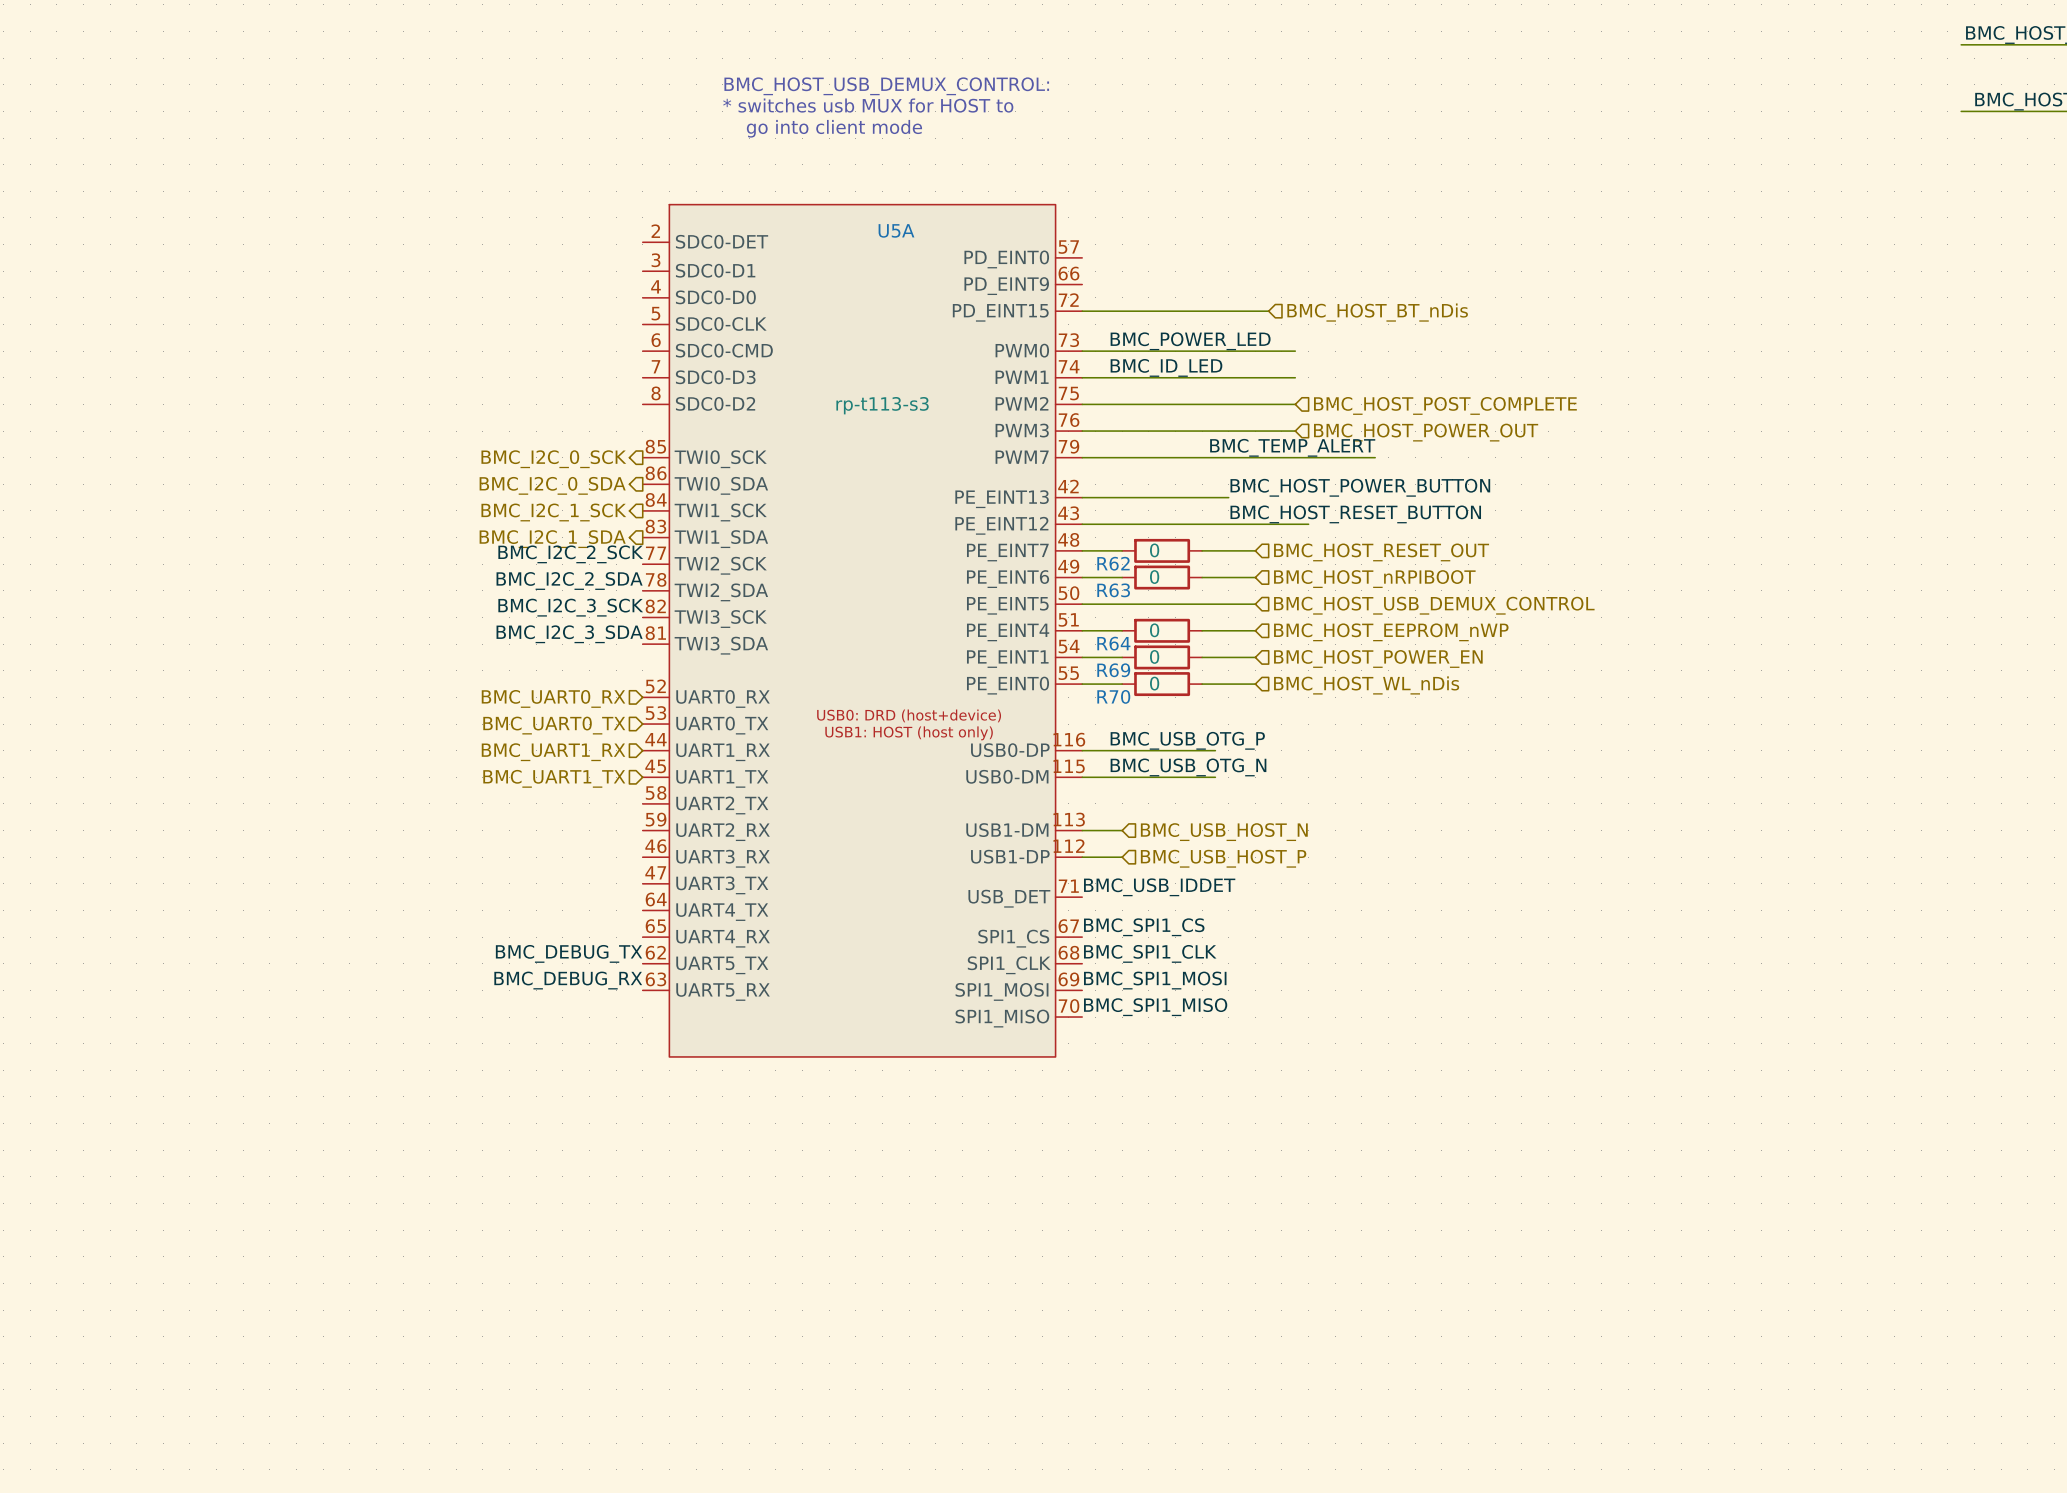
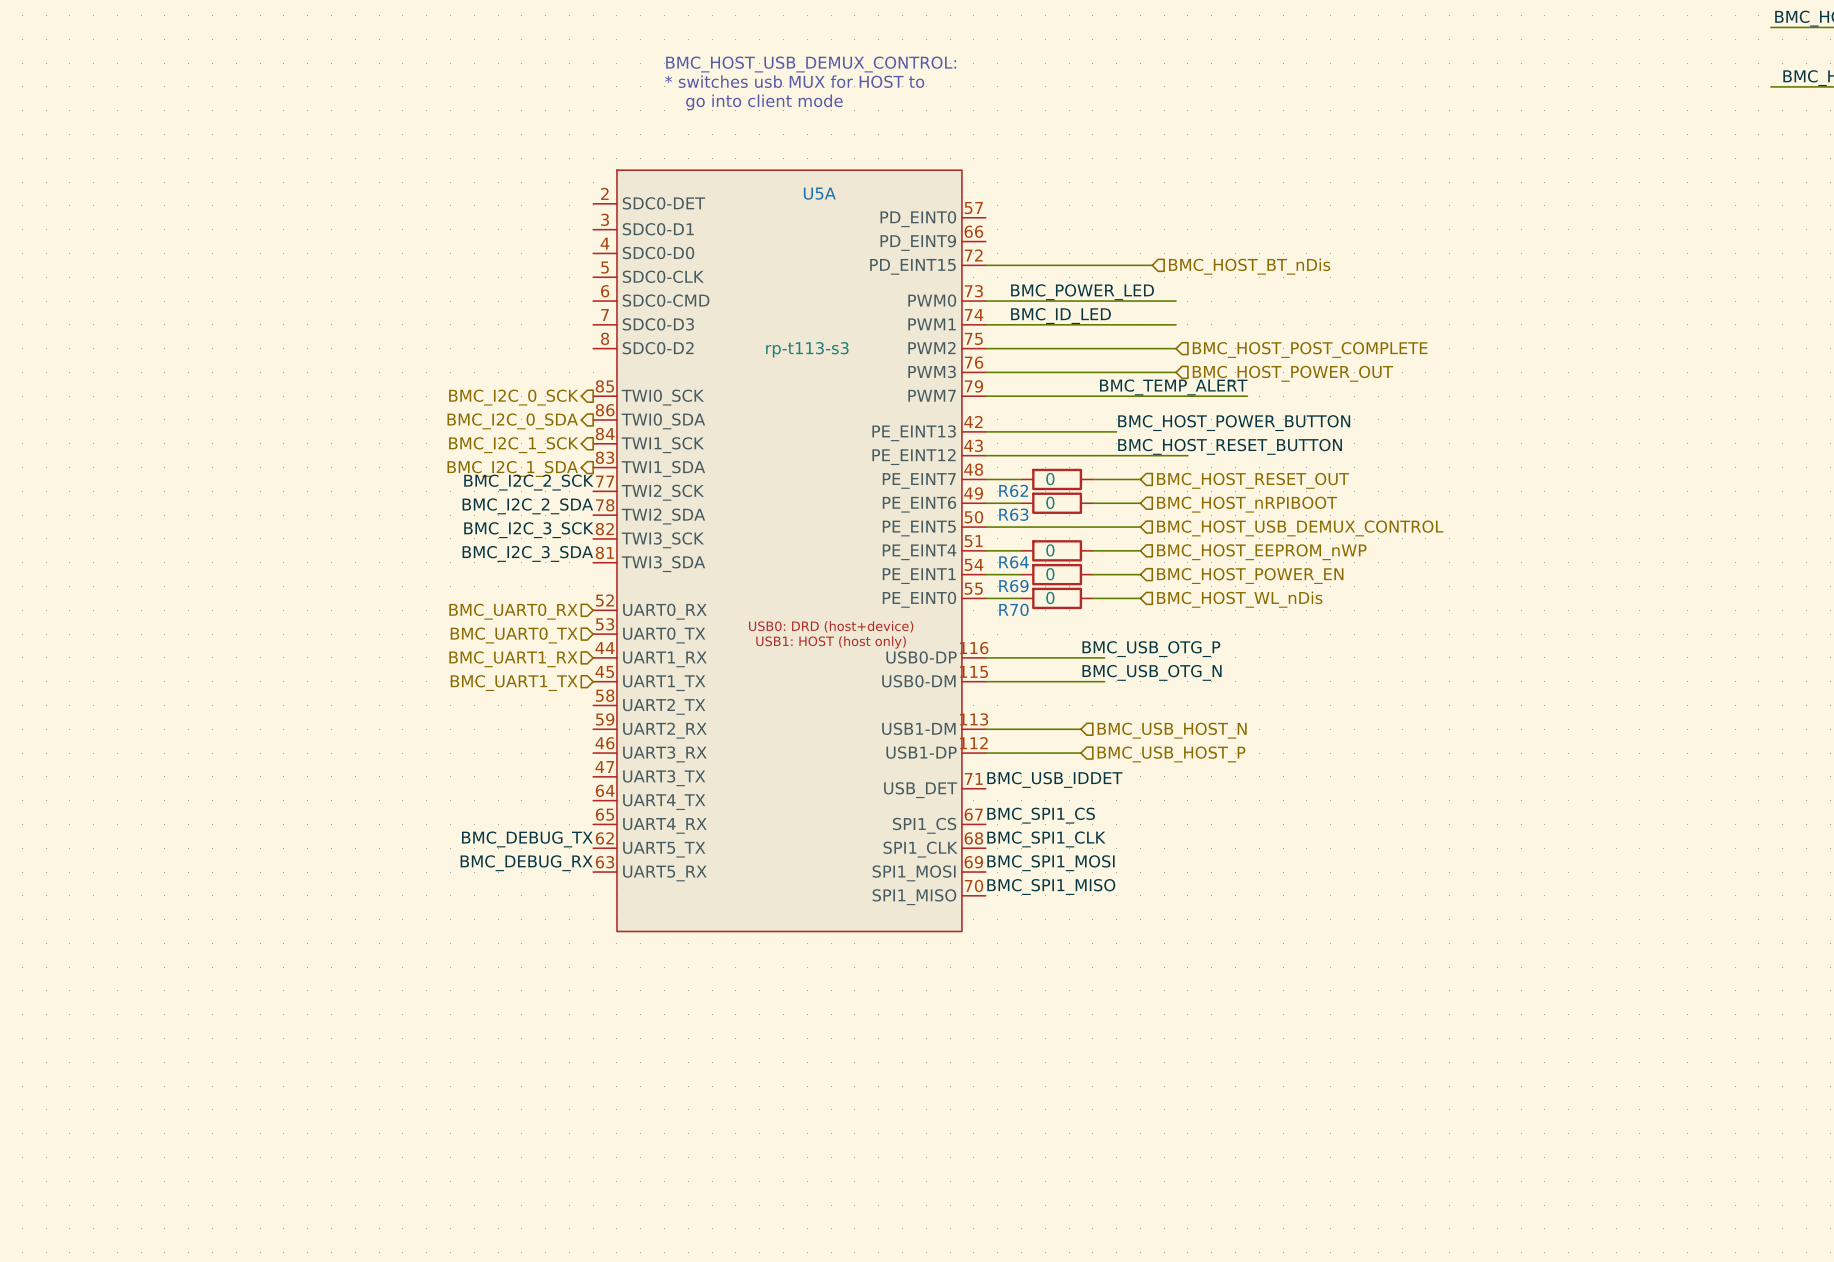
label position: BMC_USB_OTG_P (1187, 740) -> BMC_USB_OTG_P (1151, 649)
label position: BMC_USB_OTG_N (1188, 767) -> BMC_USB_OTG_N (1152, 672)
wire: none -> (1021, 729) (1080, 729)
hierarchical label position: BMC_USB_HOST_N (1224, 832) -> BMC_USB_HOST_N (1172, 730)
wire: none -> (1021, 753) (1080, 753)
hierarchical label position: BMC_USB_HOST_P (1223, 858) -> BMC_USB_HOST_P (1171, 754)

